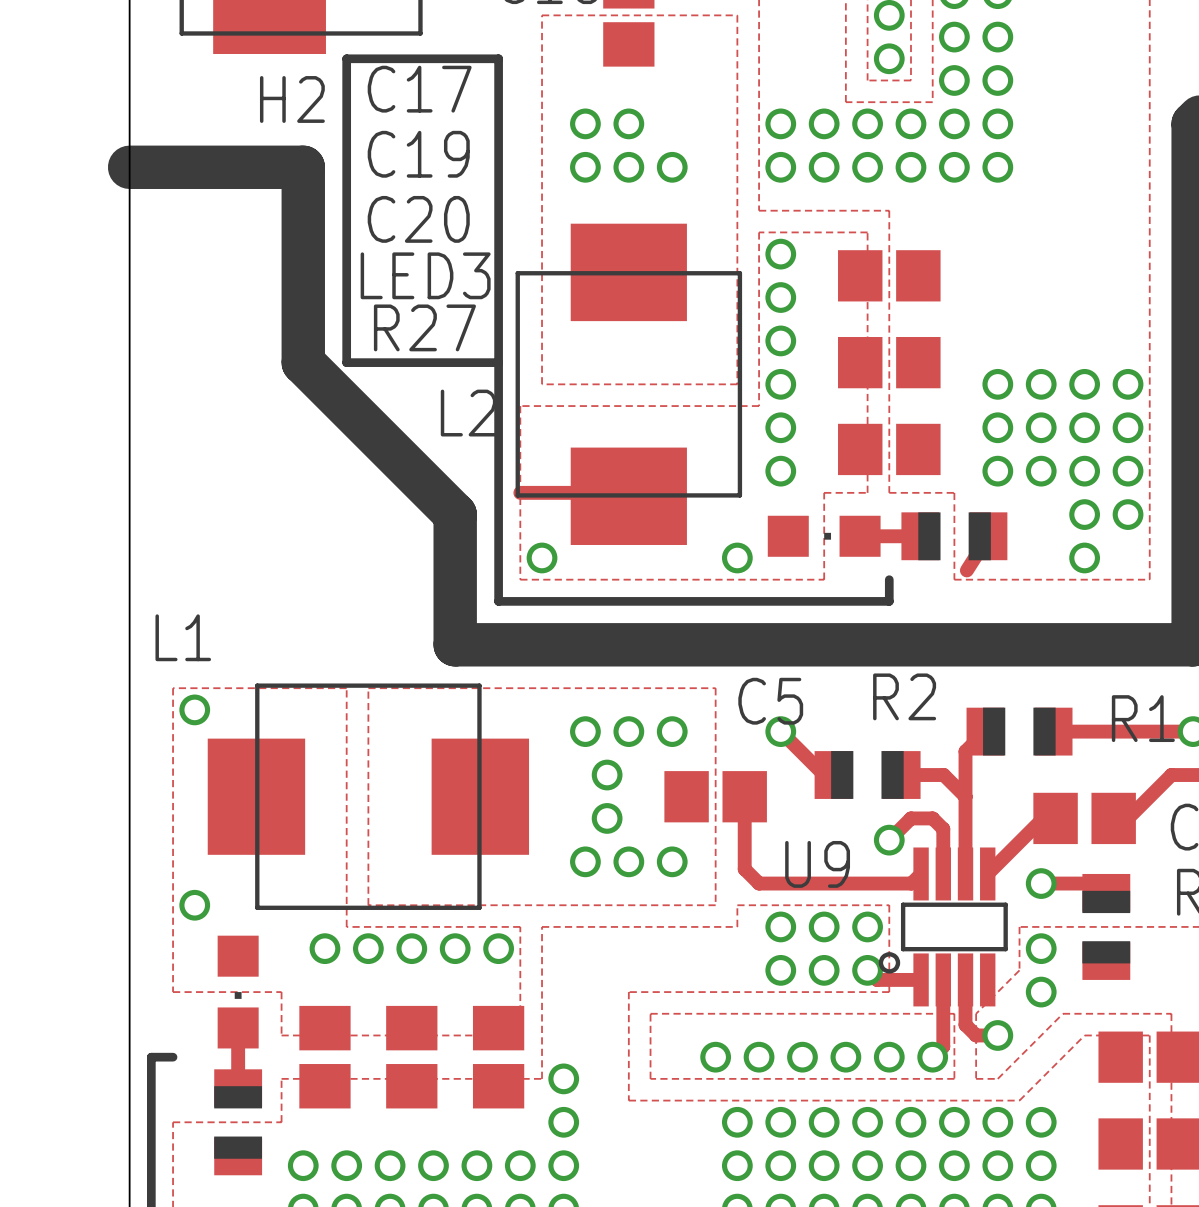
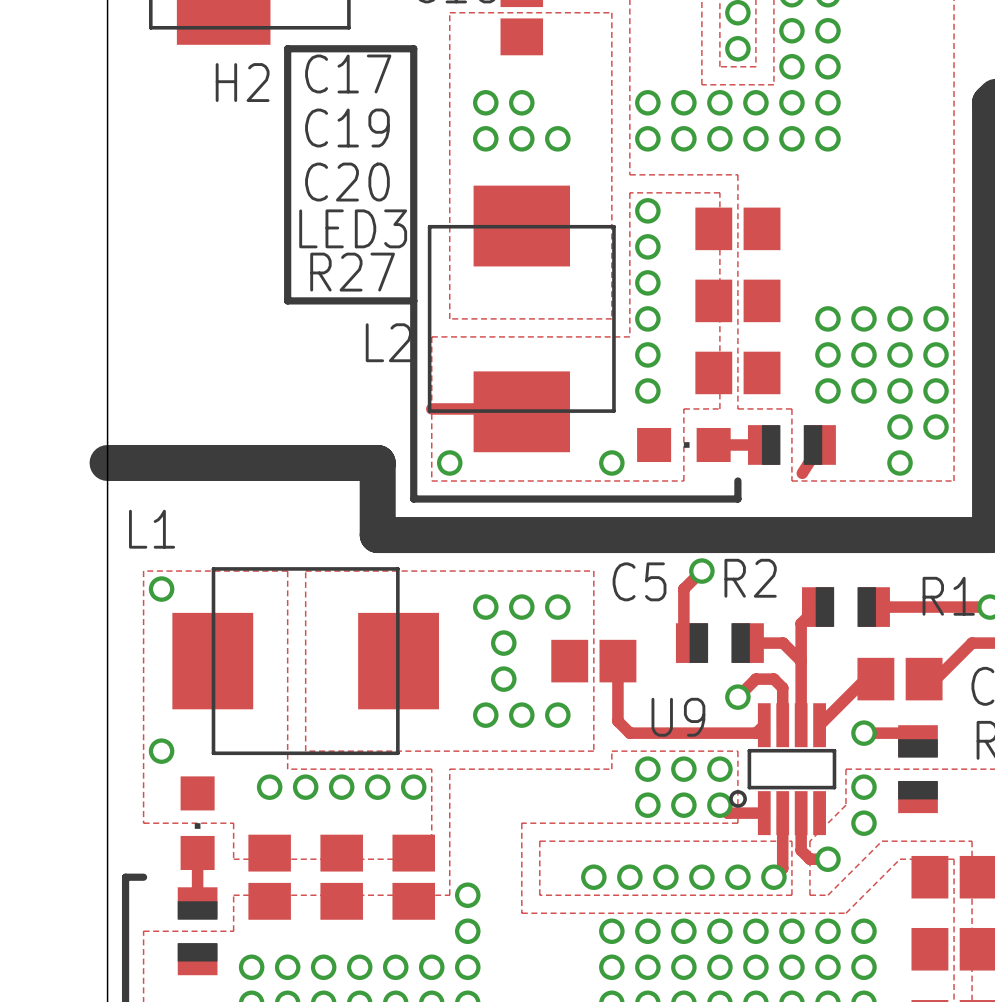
line: (129, 167) (303, 167) (303, 362) (455, 514) (455, 557) -> (107, 462) (377, 462)
track: none -> (701, 571) (683, 589) (683, 635) (691, 643)
track: (780, 731) (824, 775) -> none
via position: (780, 731) -> (701, 571)

